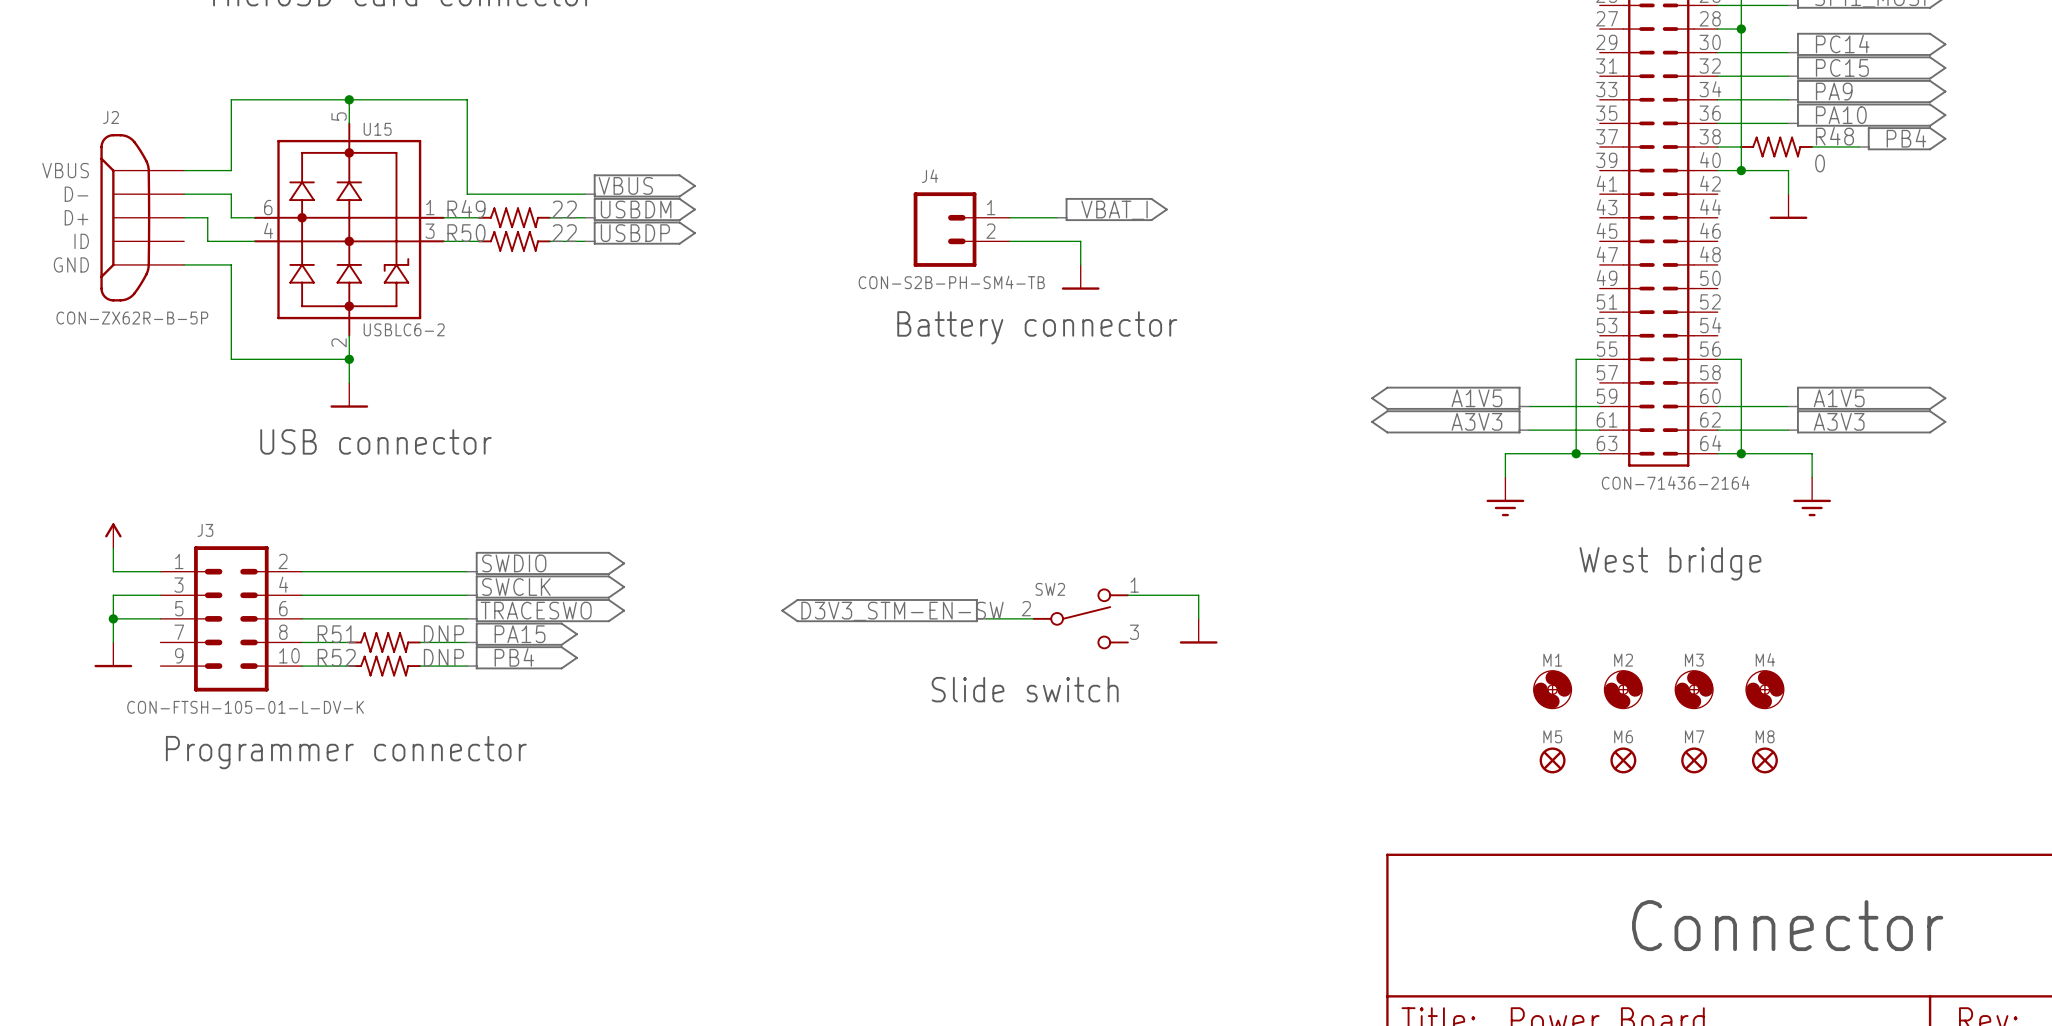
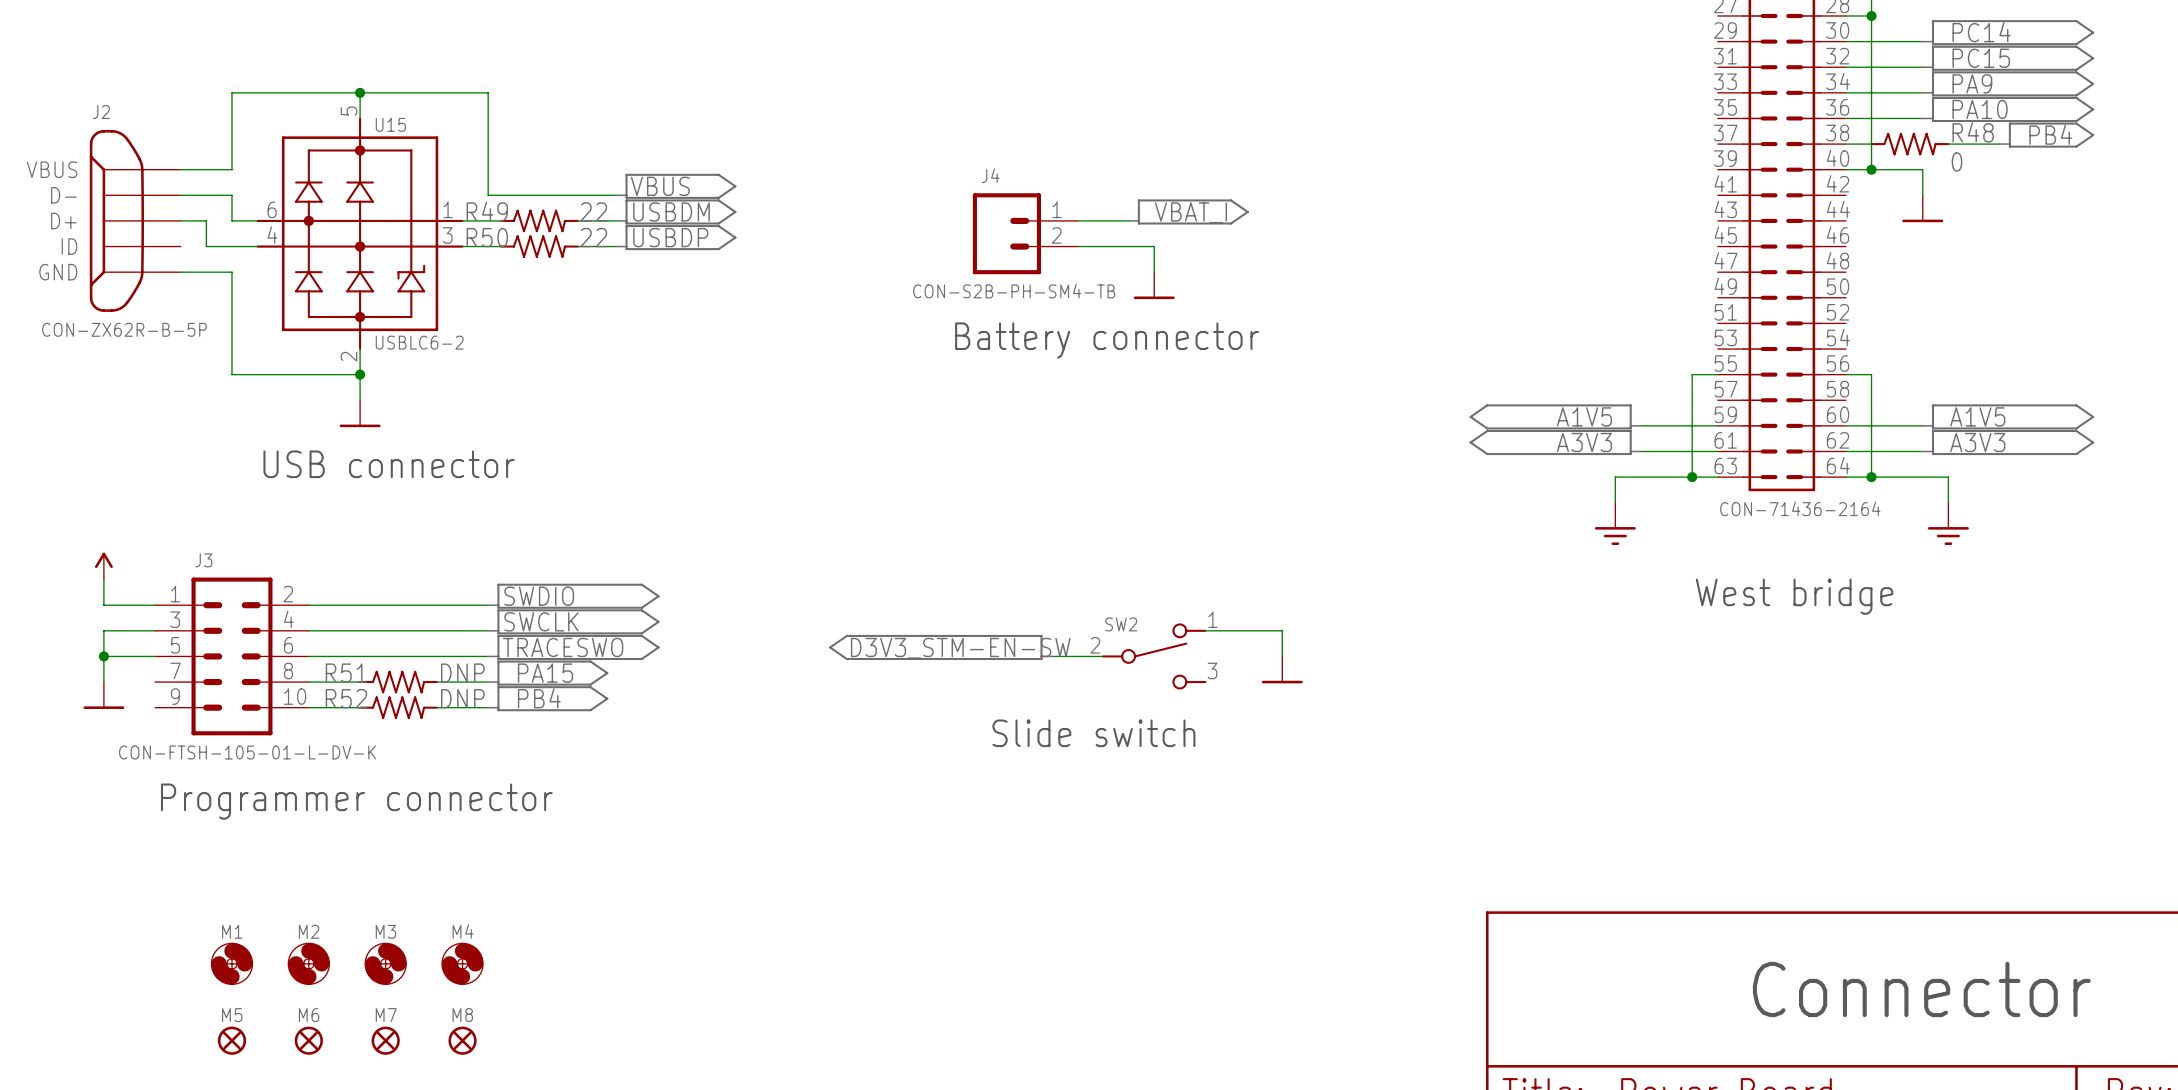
M1 position: (1552, 689) -> (231, 963)
M2 position: (1623, 689) -> (308, 963)
M3 position: (1694, 689) -> (385, 963)
M4 position: (1764, 689) -> (462, 963)
M5 position: (1552, 760) -> (231, 1040)
M6 position: (1623, 760) -> (308, 1040)
M7 position: (1694, 760) -> (385, 1040)
M8 position: (1764, 760) -> (462, 1040)

